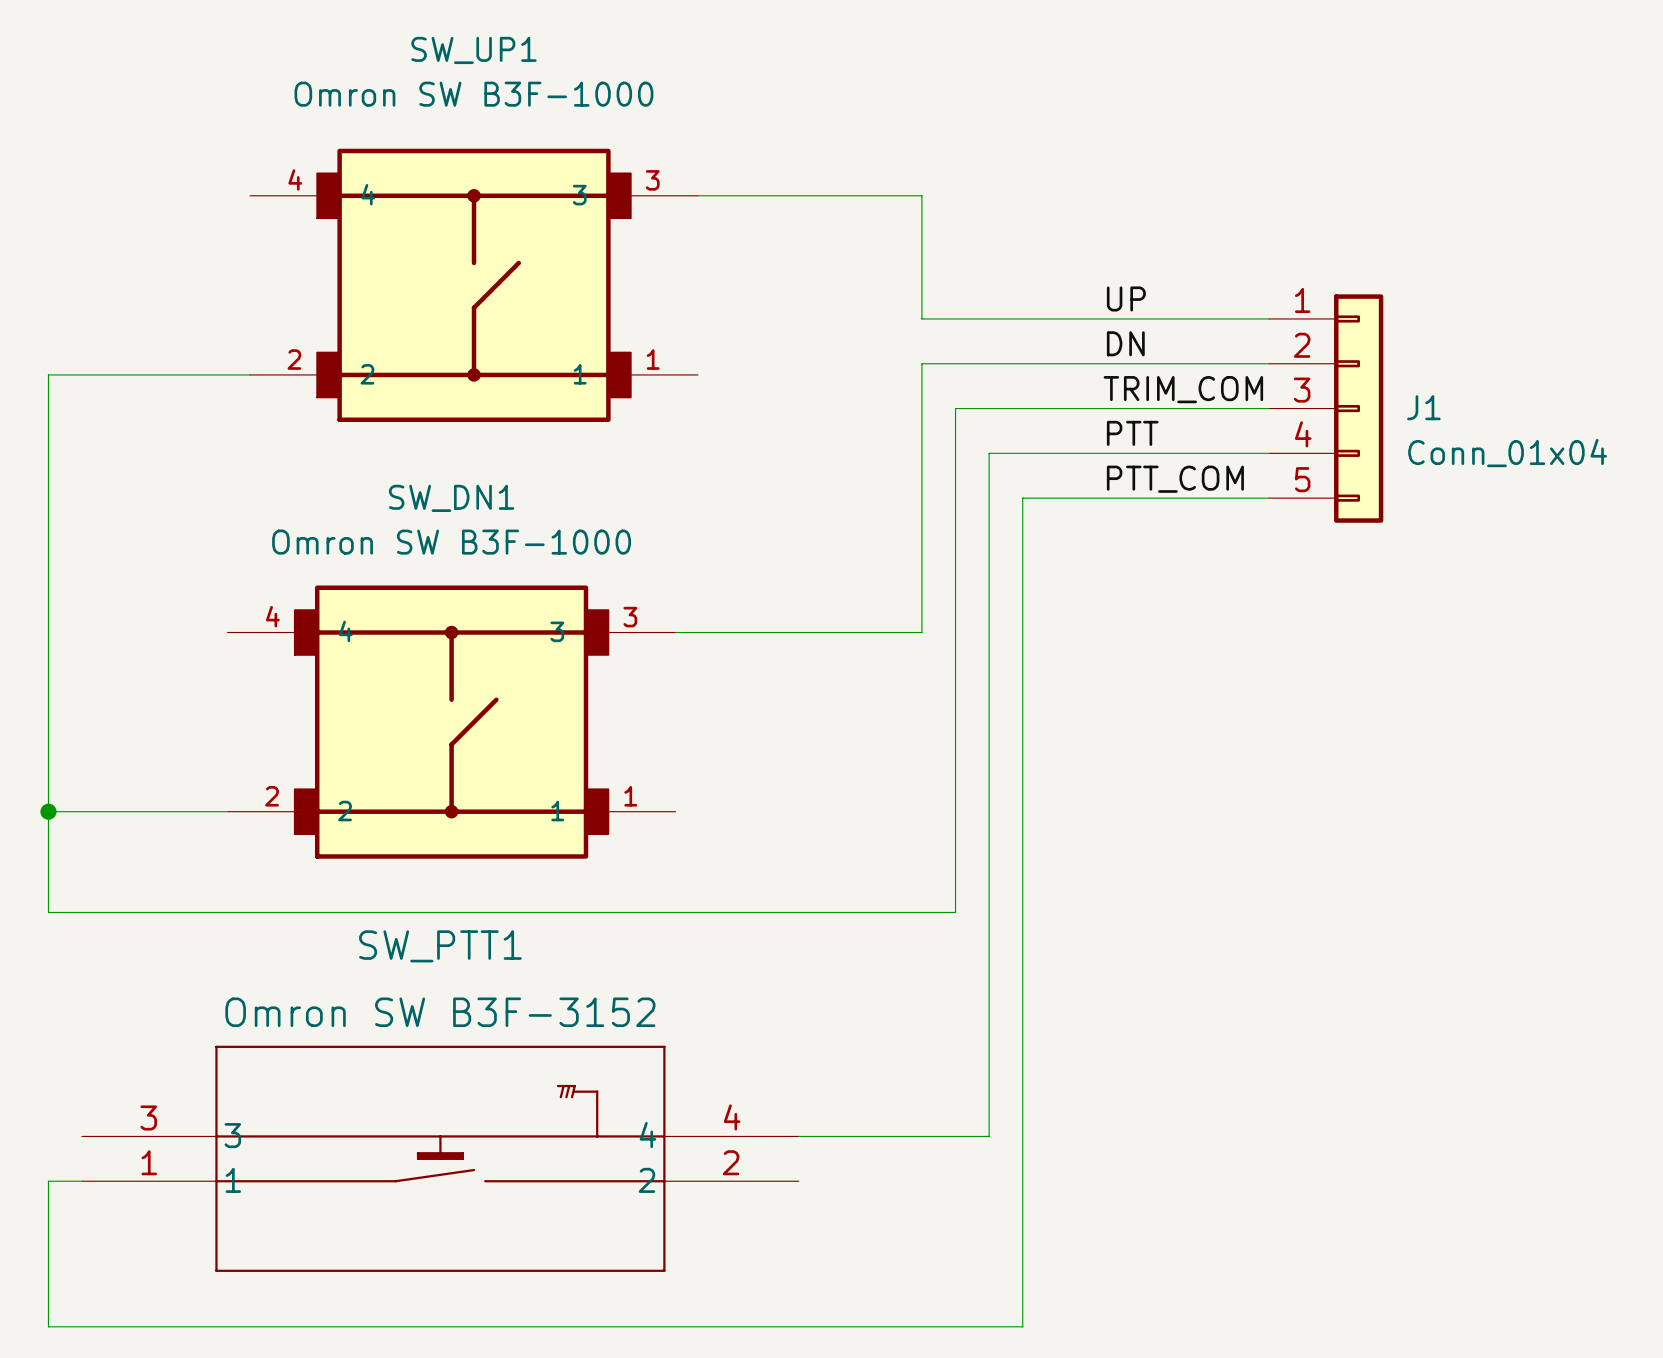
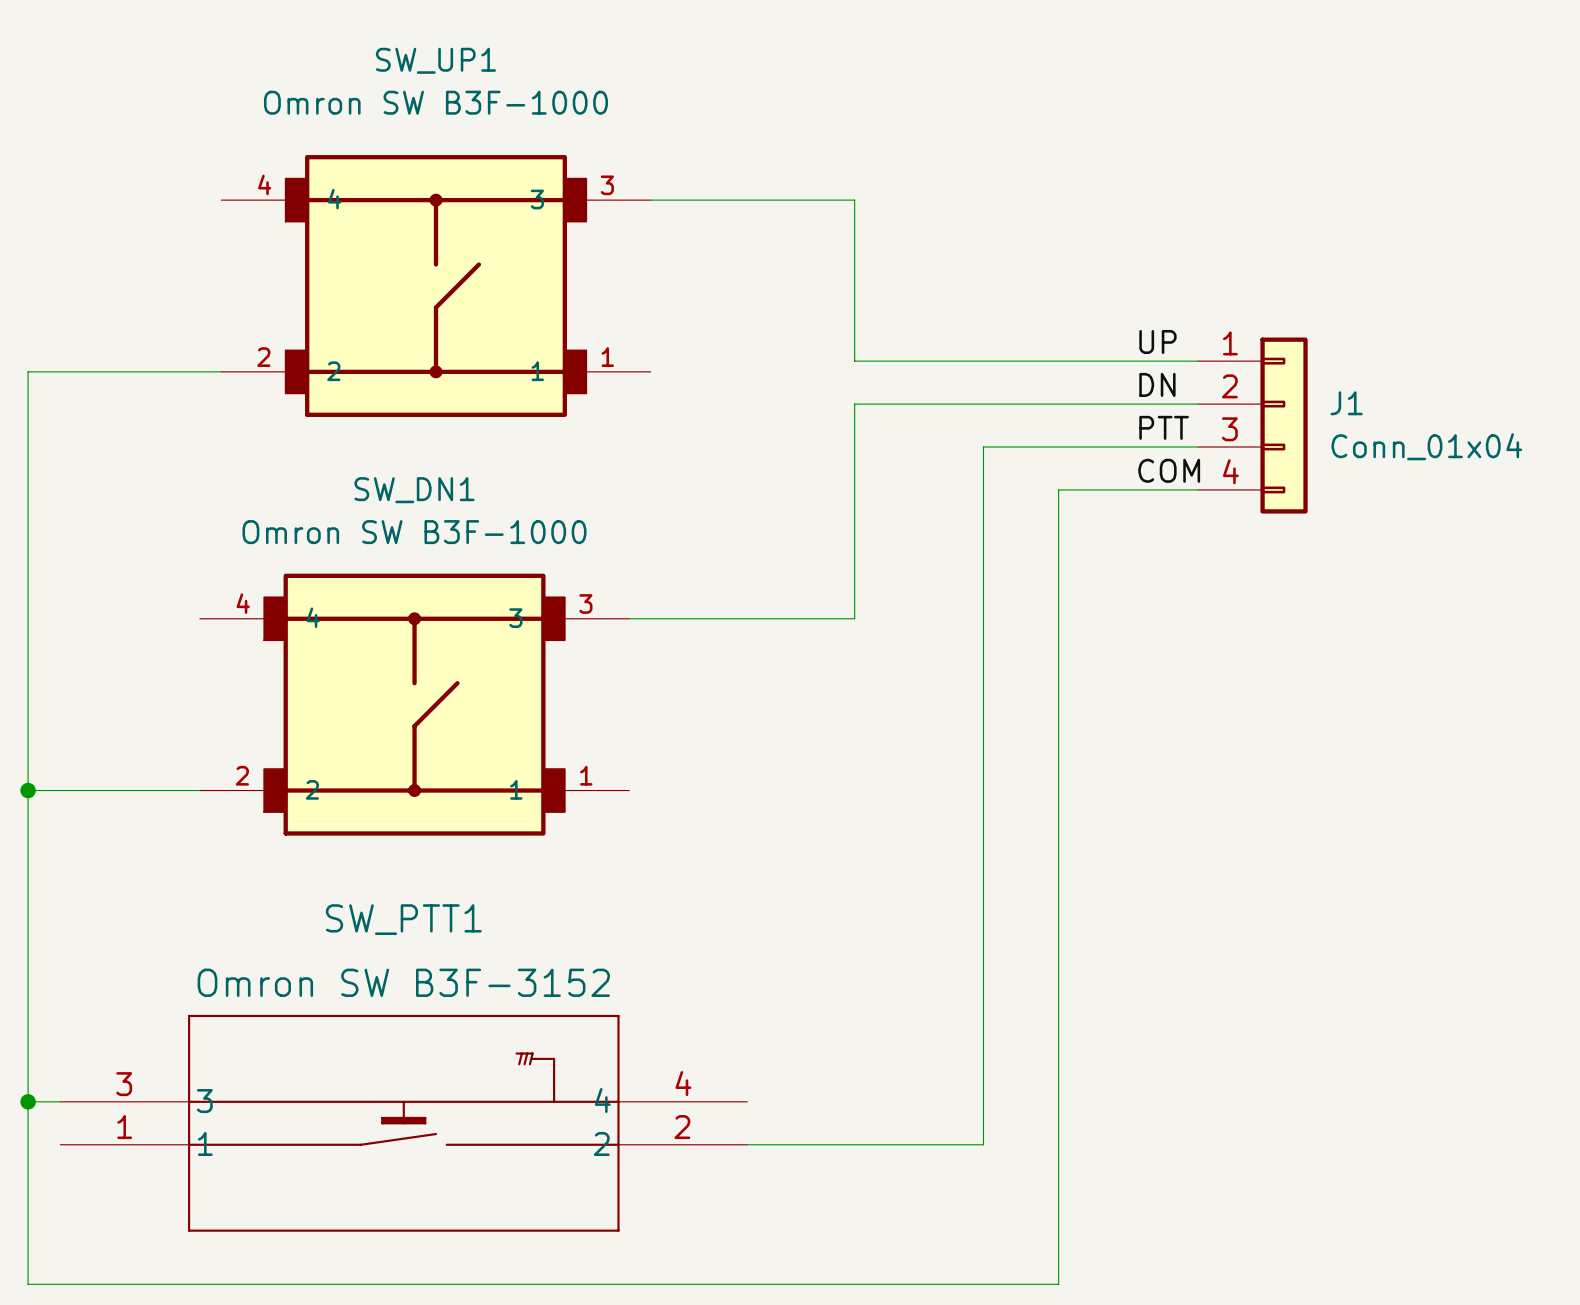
wire: (910, 195) (921, 195) (921, 318) (1269, 318) -> (854, 200) (854, 361) (865, 361)
J1 symbol: [1269, 294, 1384, 523] -> [1198, 337, 1308, 514]
label position: UP (1126, 298) -> UP (1157, 341)
label position: DN (1125, 343) -> DN (1157, 384)
wire: (921, 363) (921, 632) (910, 632) -> (897, 404) (854, 404) (854, 618)
label: TRIM_COM (1183, 389) -> none
wire: (955, 408) (955, 912) (48, 912) -> none
label position: PTT (1132, 433) -> PTT (1164, 427)
wire: (1045, 453) (989, 453) (989, 1136) (798, 1136) -> (983, 447) (983, 1144) (747, 1144)
label: none -> COM (1169, 470)
label: PTT_COM (1175, 479) -> none
wire: (1123, 498) (1022, 498) (1022, 1326) -> (1058, 489) (1058, 1284) (962, 1284)
wire: none -> (28, 1101) (60, 1101)
junction: none -> (28, 1101)
wire: (48, 1181) (82, 1181) -> (28, 1144) (28, 887)

